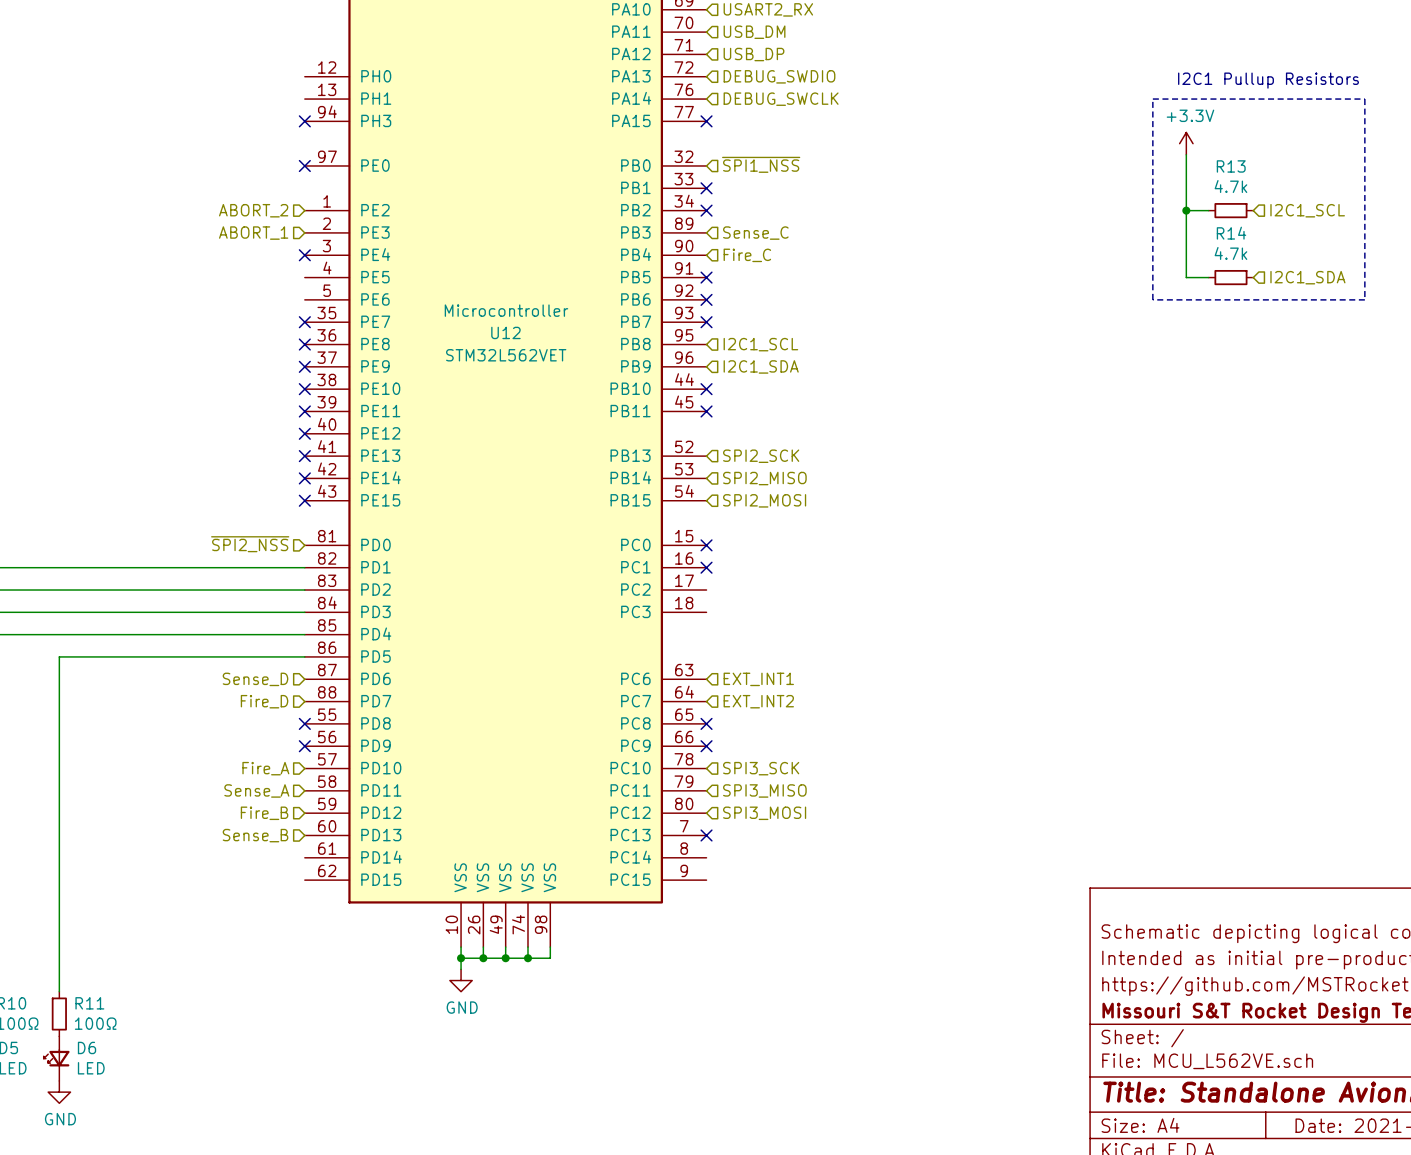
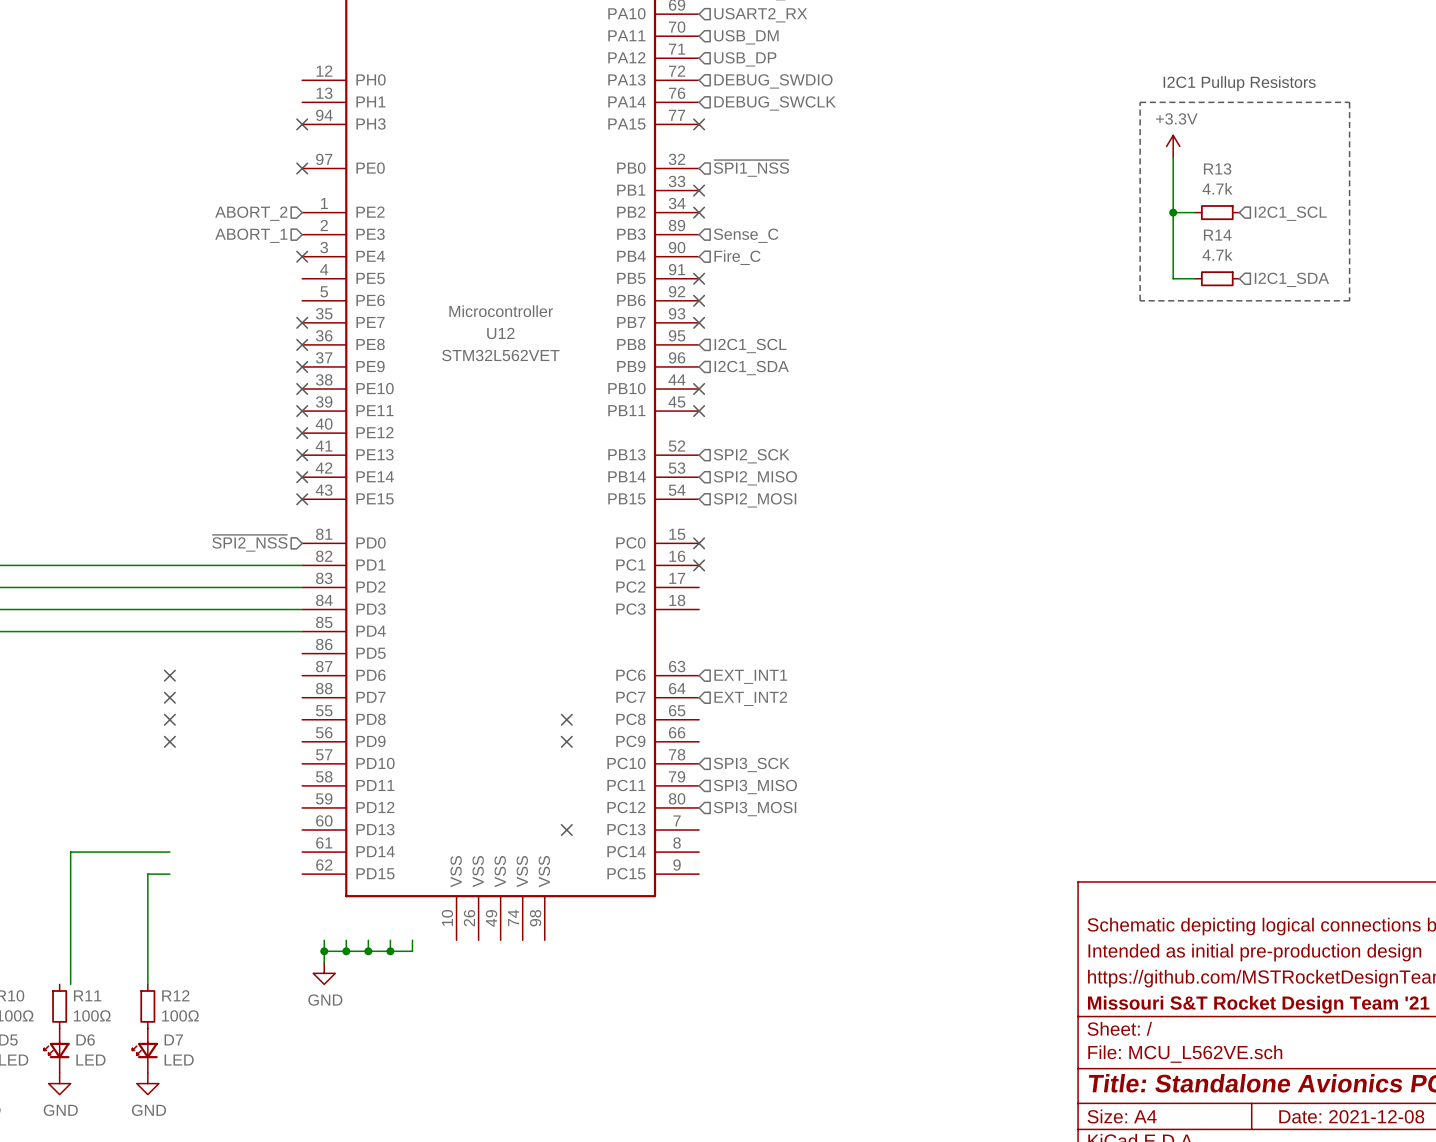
wire: (304, 656) (59, 656) (59, 991) -> none
no-connect mark: none -> (169, 675)
hierarchical label: Sense_D (255, 679) -> none
no-connect mark: none -> (169, 697)
hierarchical label: Fire_D (264, 701) -> none
no-connect mark: none -> (169, 719)
no-connect mark: (304, 723) -> none
no-connect mark: none -> (566, 719)
no-connect mark: (706, 723) -> none
no-connect mark: none -> (169, 741)
no-connect mark: (304, 746) -> none
no-connect mark: none -> (566, 741)
no-connect mark: (706, 746) -> none
hierarchical label: Fire_A (265, 768) -> none
hierarchical label: Sense_A (256, 790) -> none
hierarchical label: Fire_B (264, 813) -> none
hierarchical label: Sense_B (255, 835) -> none
no-connect mark: none -> (566, 830)
no-connect mark: (706, 835) -> none
wire: none -> (169, 852) (70, 852) (70, 984)
wire: none -> (169, 874) (147, 874) (147, 984)
wire: (461, 947) (461, 969) -> (324, 940) (324, 962)
wire: (483, 947) (483, 958) -> (346, 940) (346, 951)
wire: (505, 947) (505, 958) -> (368, 940) (368, 951)
wire: (527, 947) (527, 958) -> (390, 940) (390, 951)
wire: (550, 947) (550, 958) (461, 958) -> (412, 940) (412, 951) (324, 951)
junction: none -> (324, 951)
junction: none -> (346, 951)
junction: none -> (368, 951)
junction: none -> (390, 951)
junction: (461, 958) -> none
junction: (483, 958) -> none
junction: (505, 958) -> none
junction: (527, 958) -> none
power symbol position: GND (461, 980) -> GND (324, 973)
R12: none -> 100Ω (147, 1006)
D7: none -> LED (145, 1050)
power symbol: none -> GND (147, 1083)

